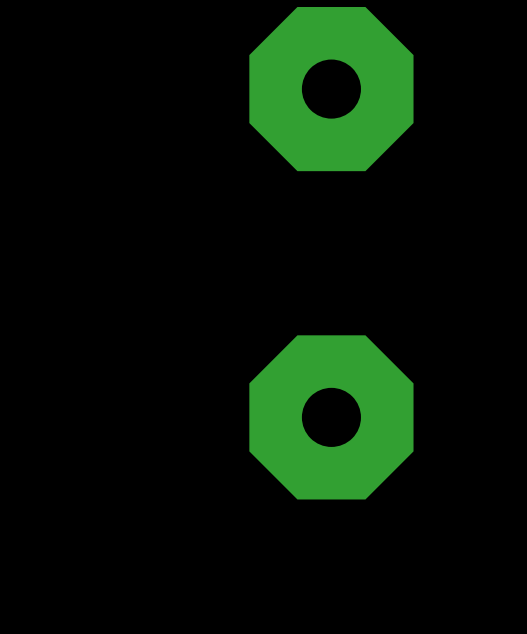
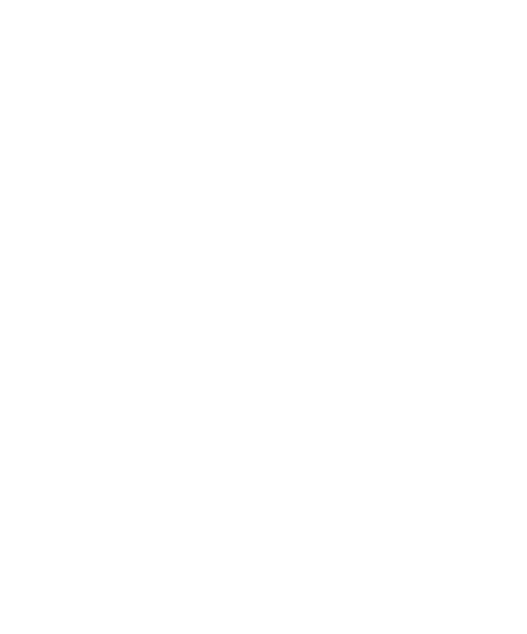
part: (331, 89) -> none
part: (331, 417) -> none

